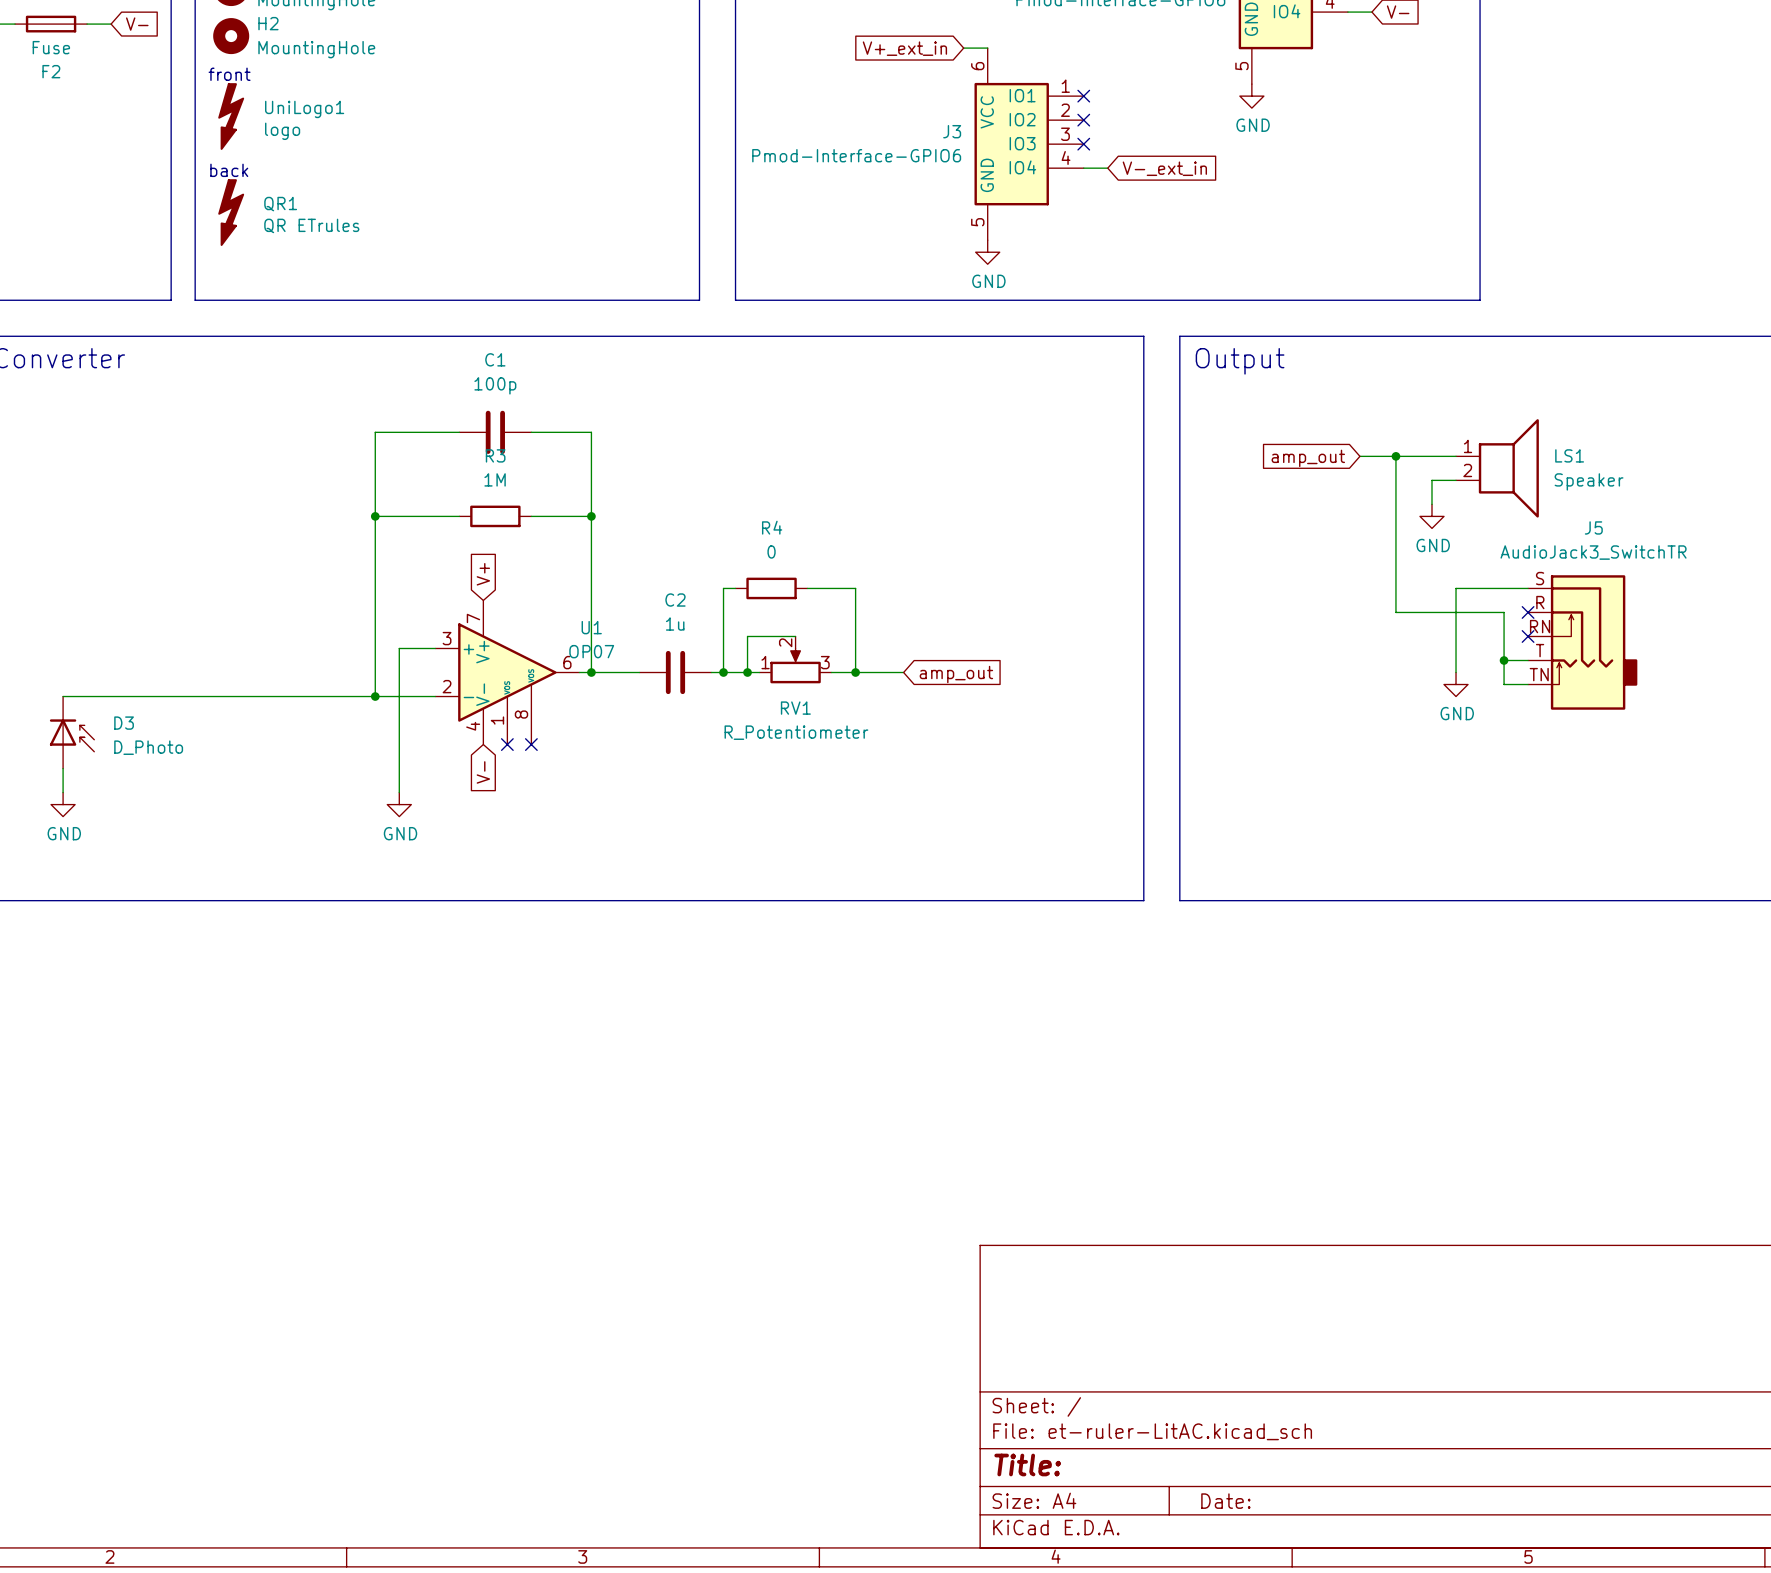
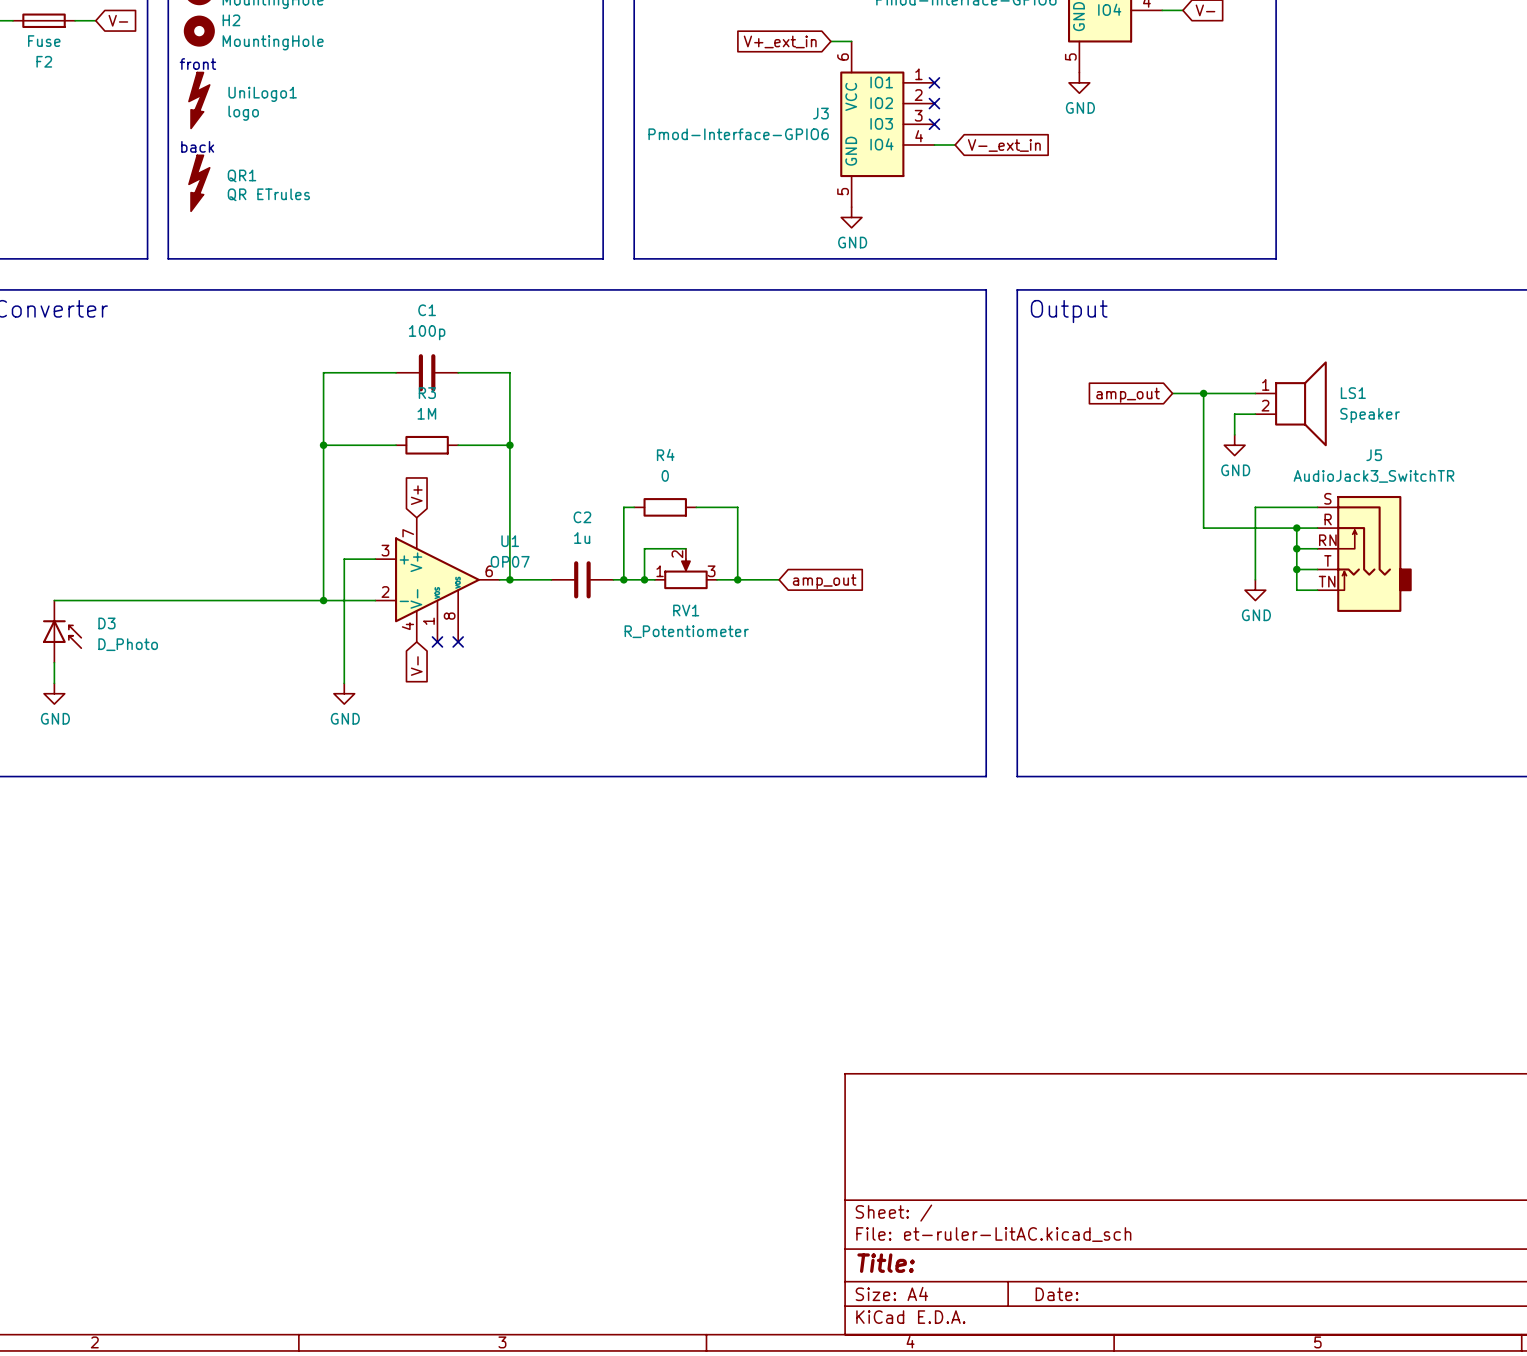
wire: none -> (1296, 528) (1317, 528)
junction: none -> (1296, 528)
no-connect mark: (1528, 612) -> none
wire: none -> (1296, 548) (1317, 548)
junction: none -> (1296, 548)
no-connect mark: (1528, 636) -> none

